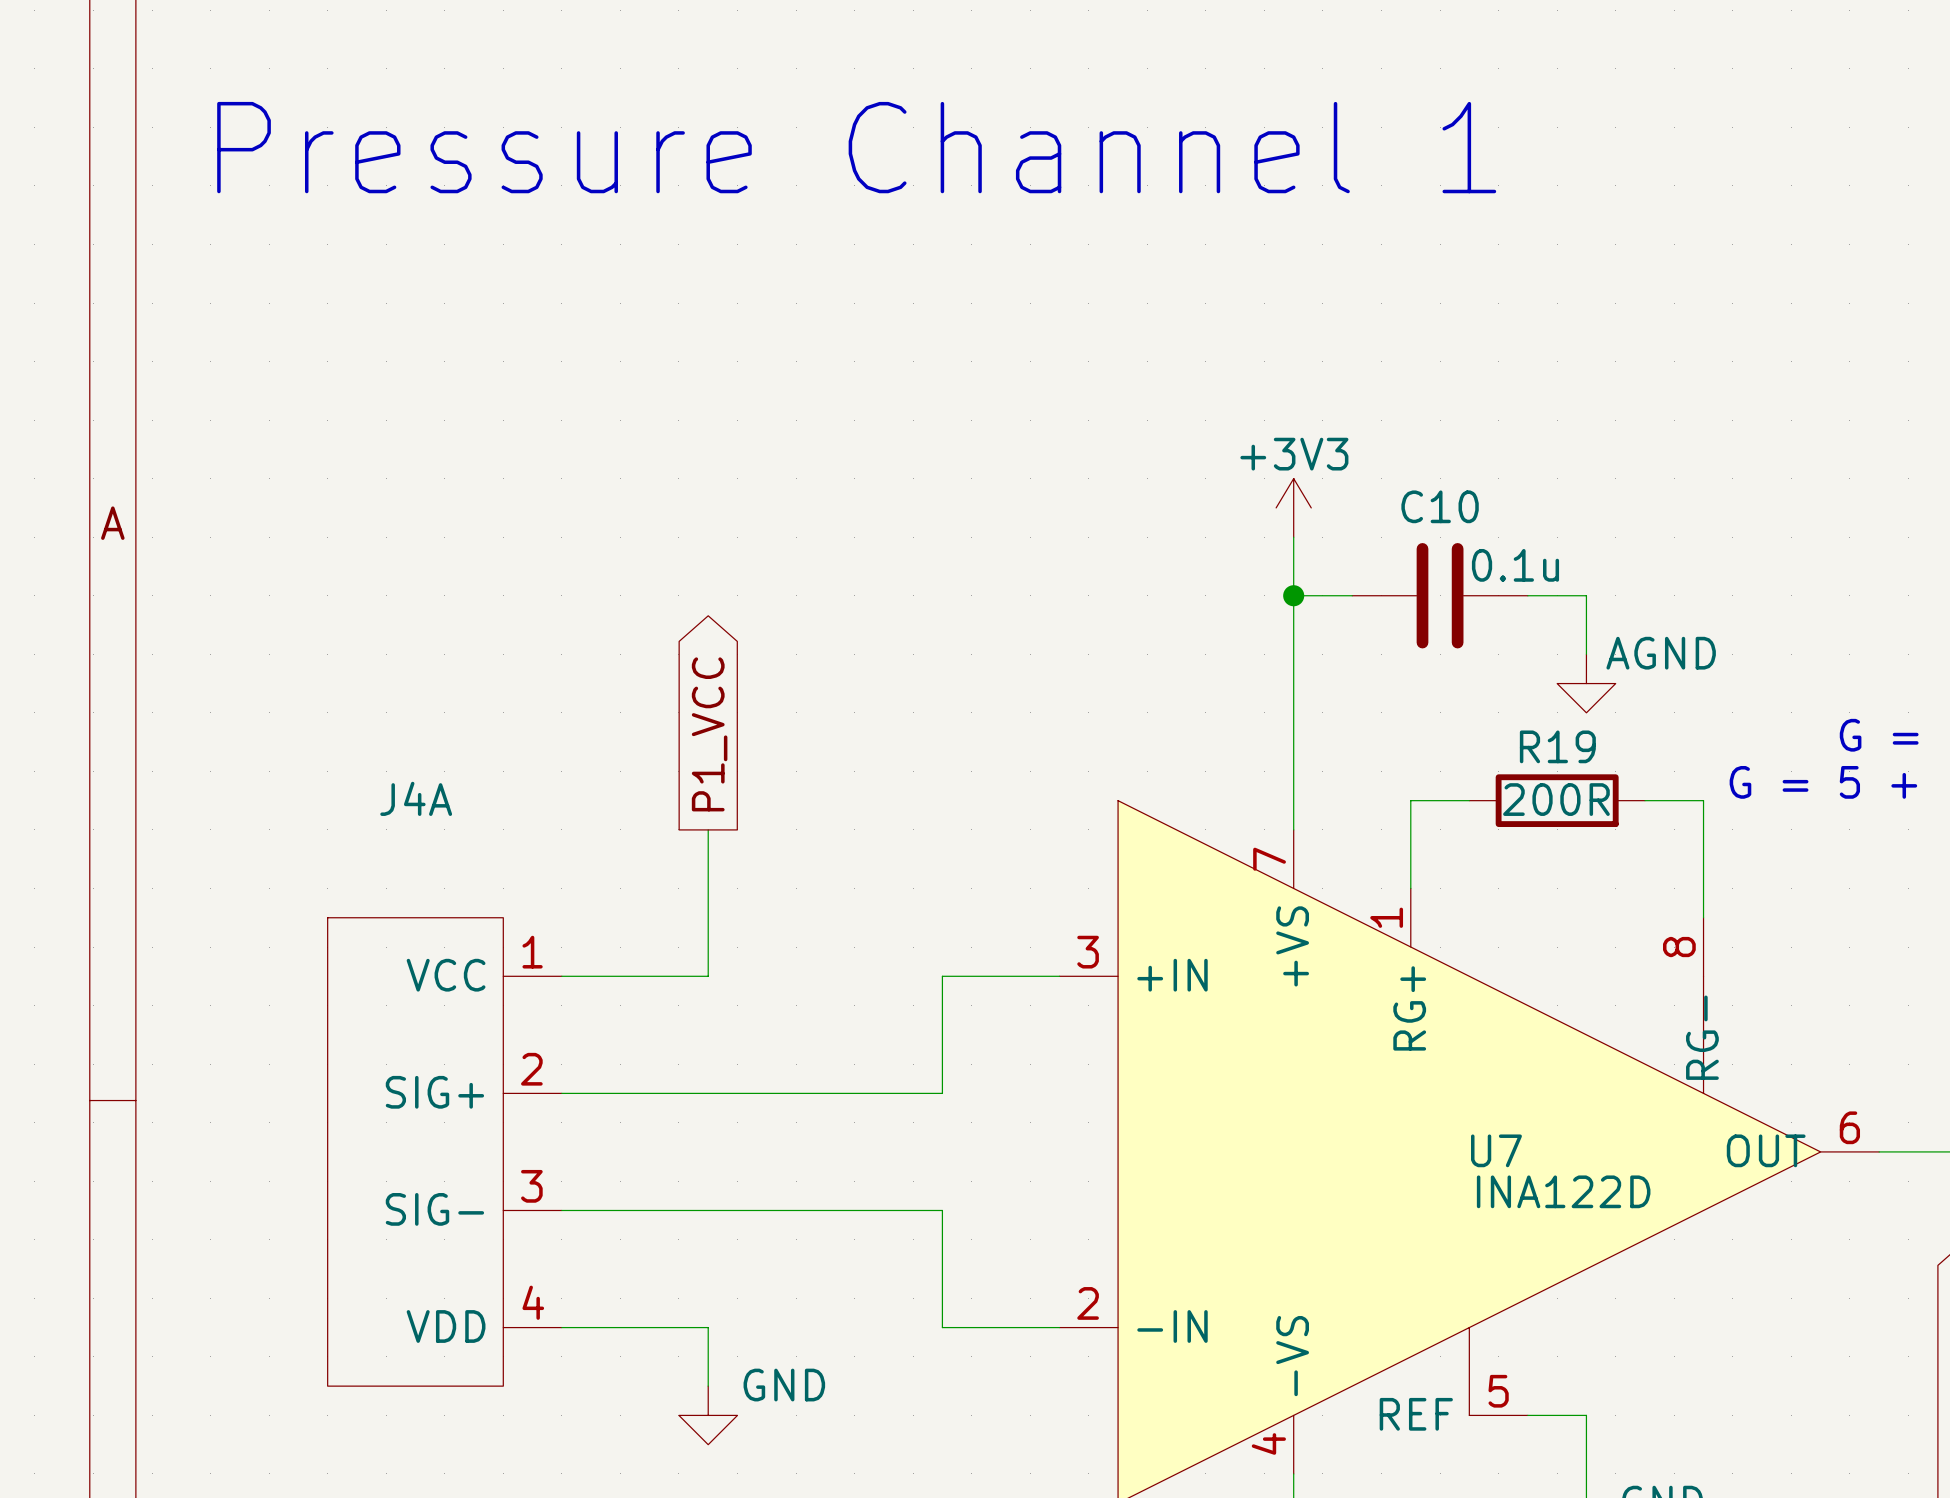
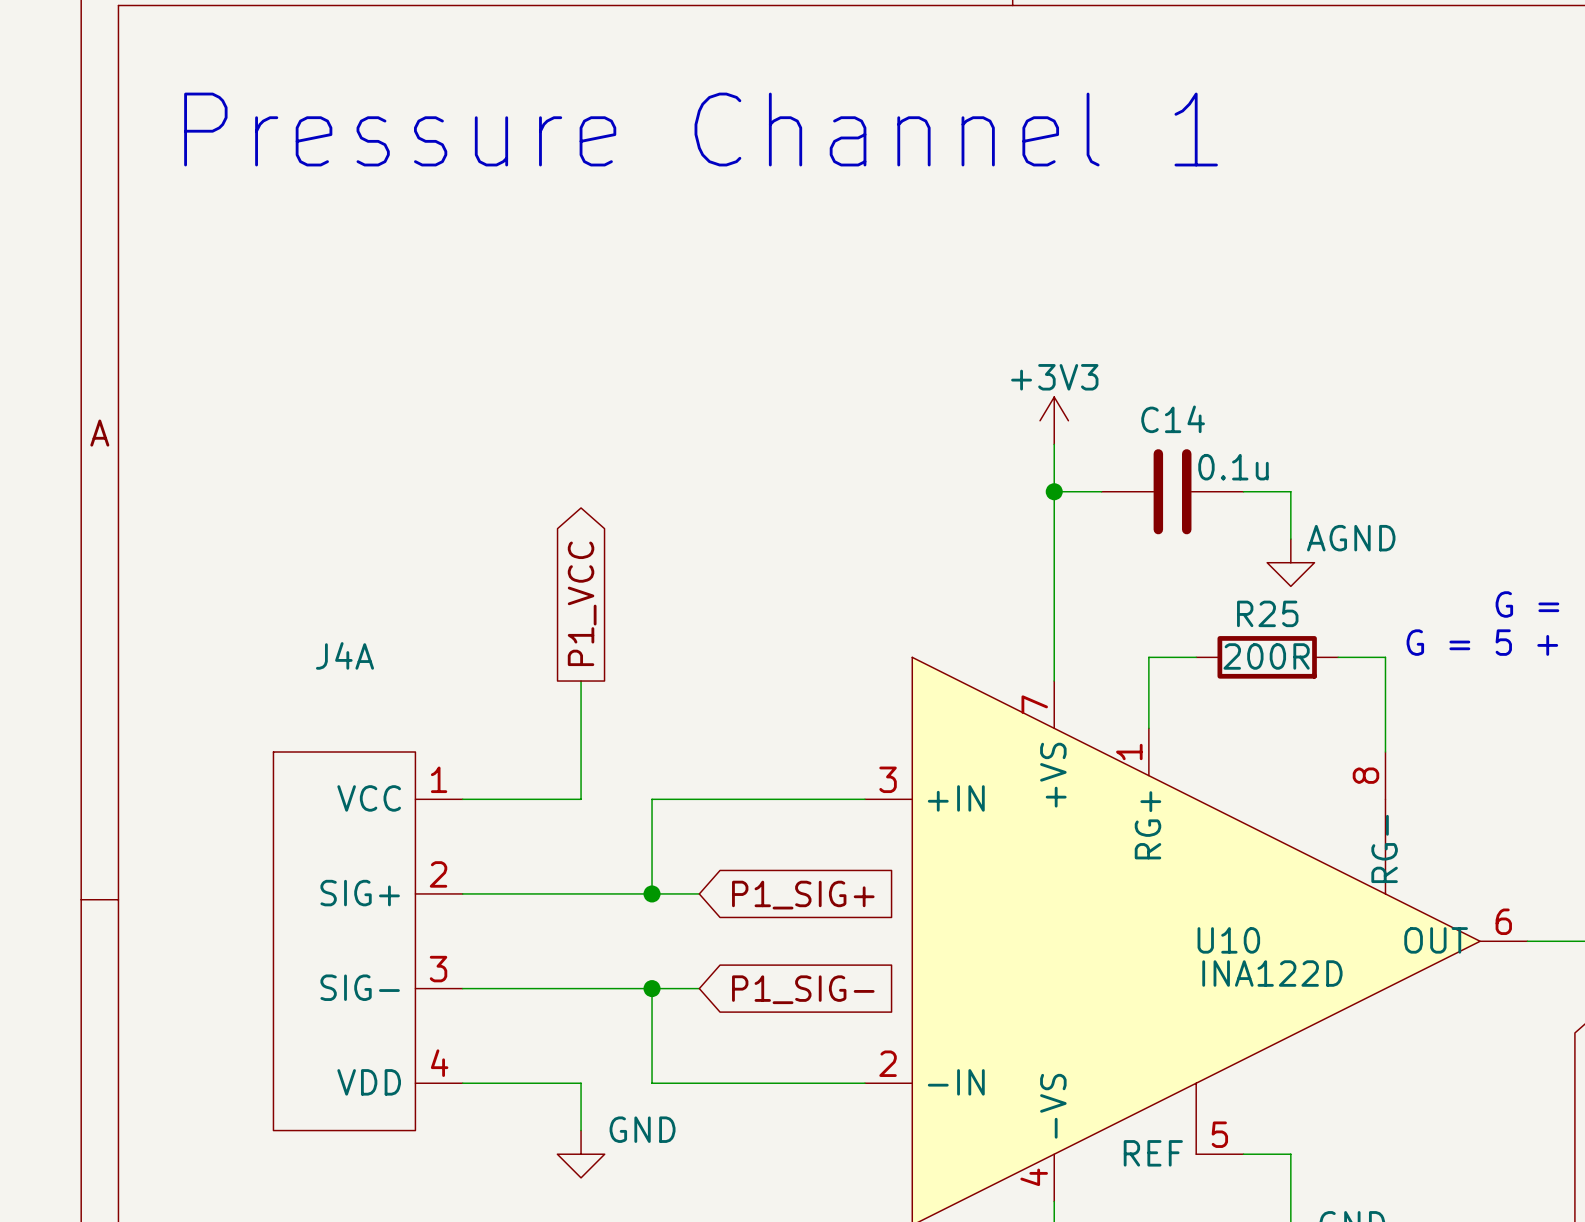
C10 name: C10 (1440, 506) -> C14 (1173, 419)
R19 name: R19 (1557, 746) -> R25 (1267, 613)
wire: (942, 976) (942, 1093) (854, 1093) -> (770, 799) (652, 799) (652, 893)
junction: none -> (652, 893)
global label: none -> P1_SIG+ (803, 895)
U7 name: U7 (1496, 1150) -> U10 (1228, 940)
junction: none -> (652, 988)
wire: (854, 1210) (942, 1210) (942, 1327) -> (652, 988) (652, 1083) (770, 1083)
global label: none -> P1_SIG- (803, 989)

